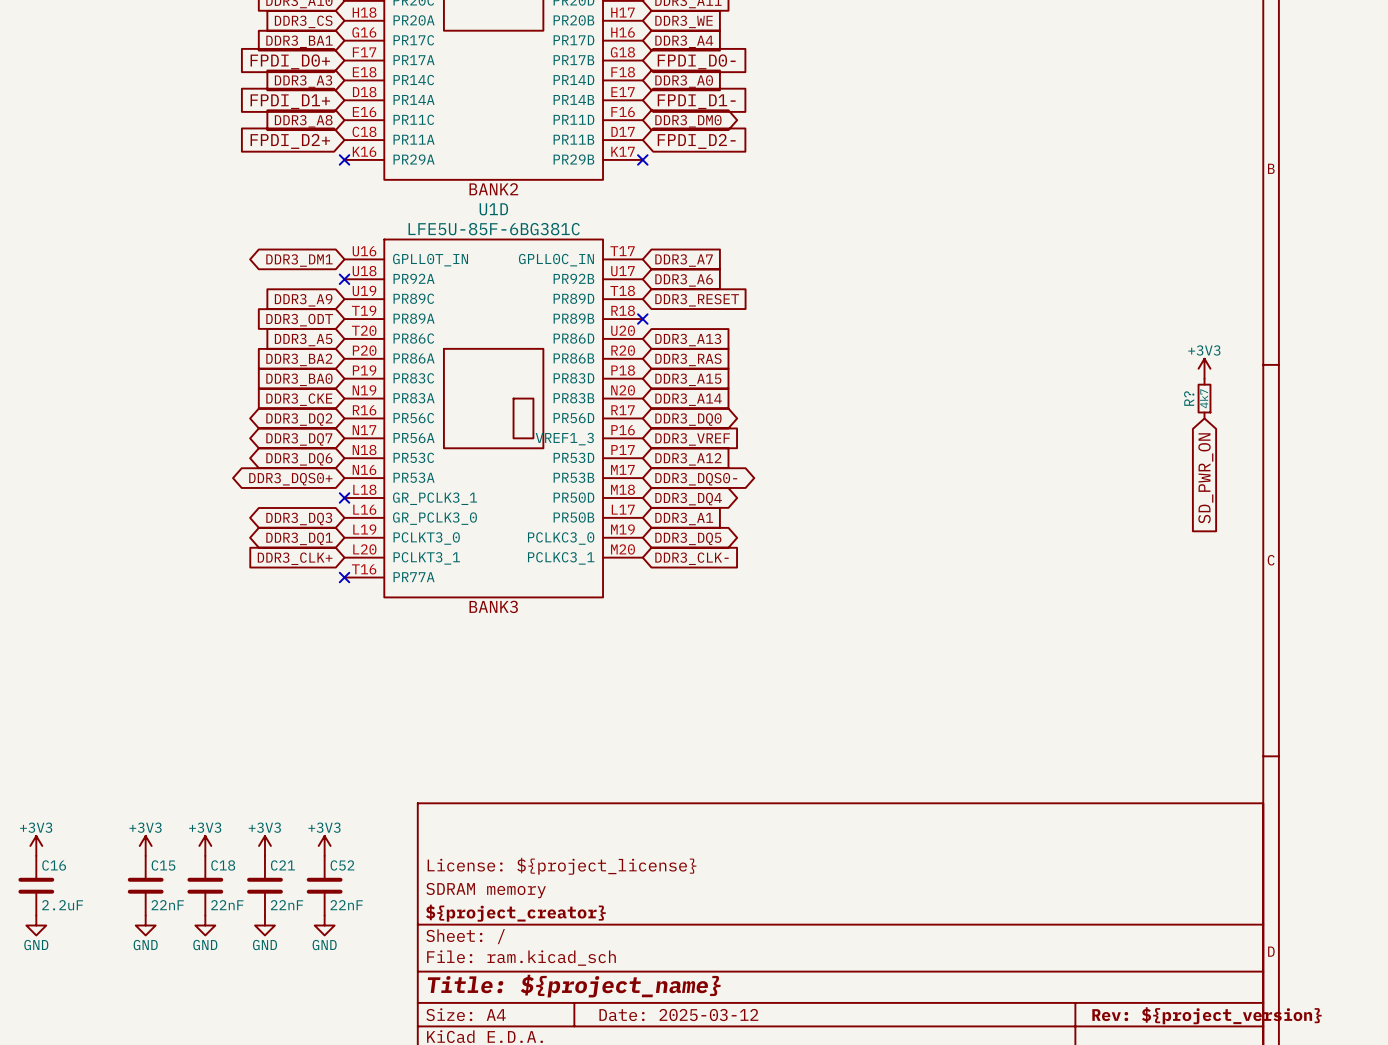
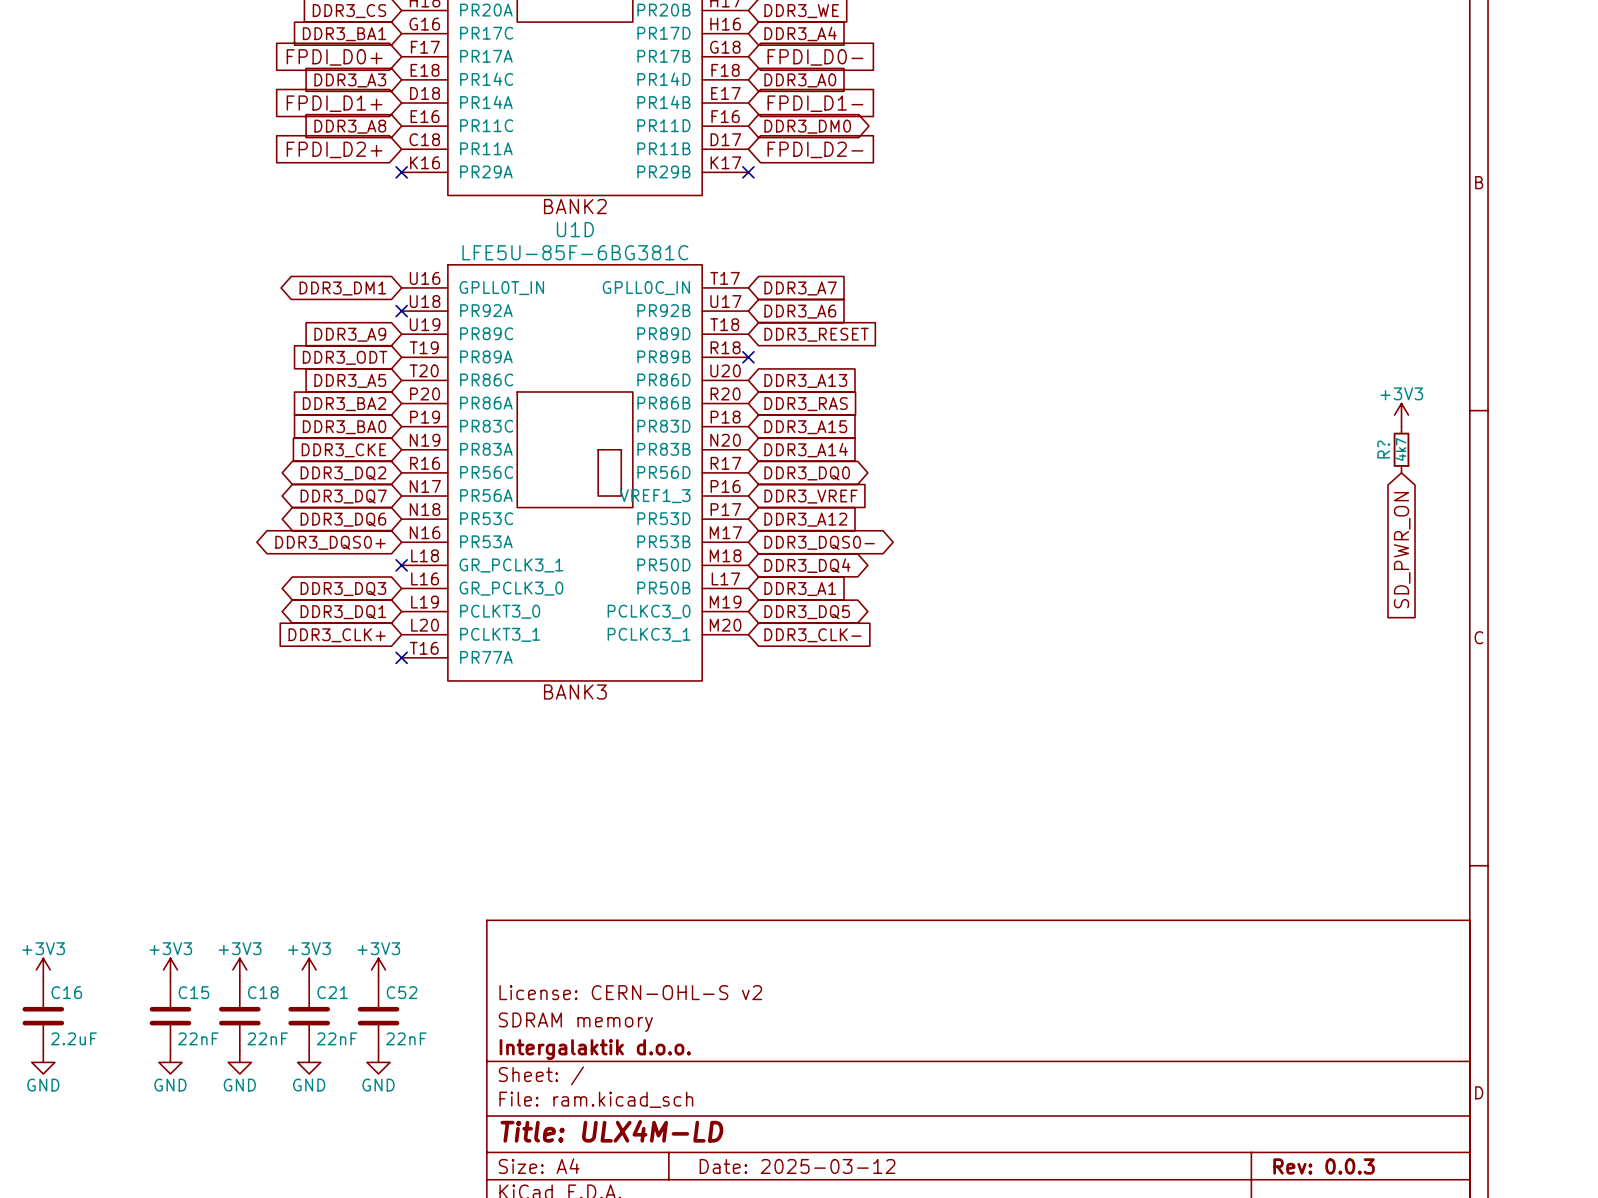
title block: License: ${project_license} (562, 866) -> License: CERN-OHL-S v2 (630, 992)
title block: ${project_creator} (515, 913) -> Intergalaktik d.o.o. (595, 1049)
title block: Title: ${project_name} (574, 986) -> Title: ULX4M-LD (611, 1131)
title block: Rev: ${project_version} (1206, 1015) -> Rev: 0.0.3 (1324, 1166)

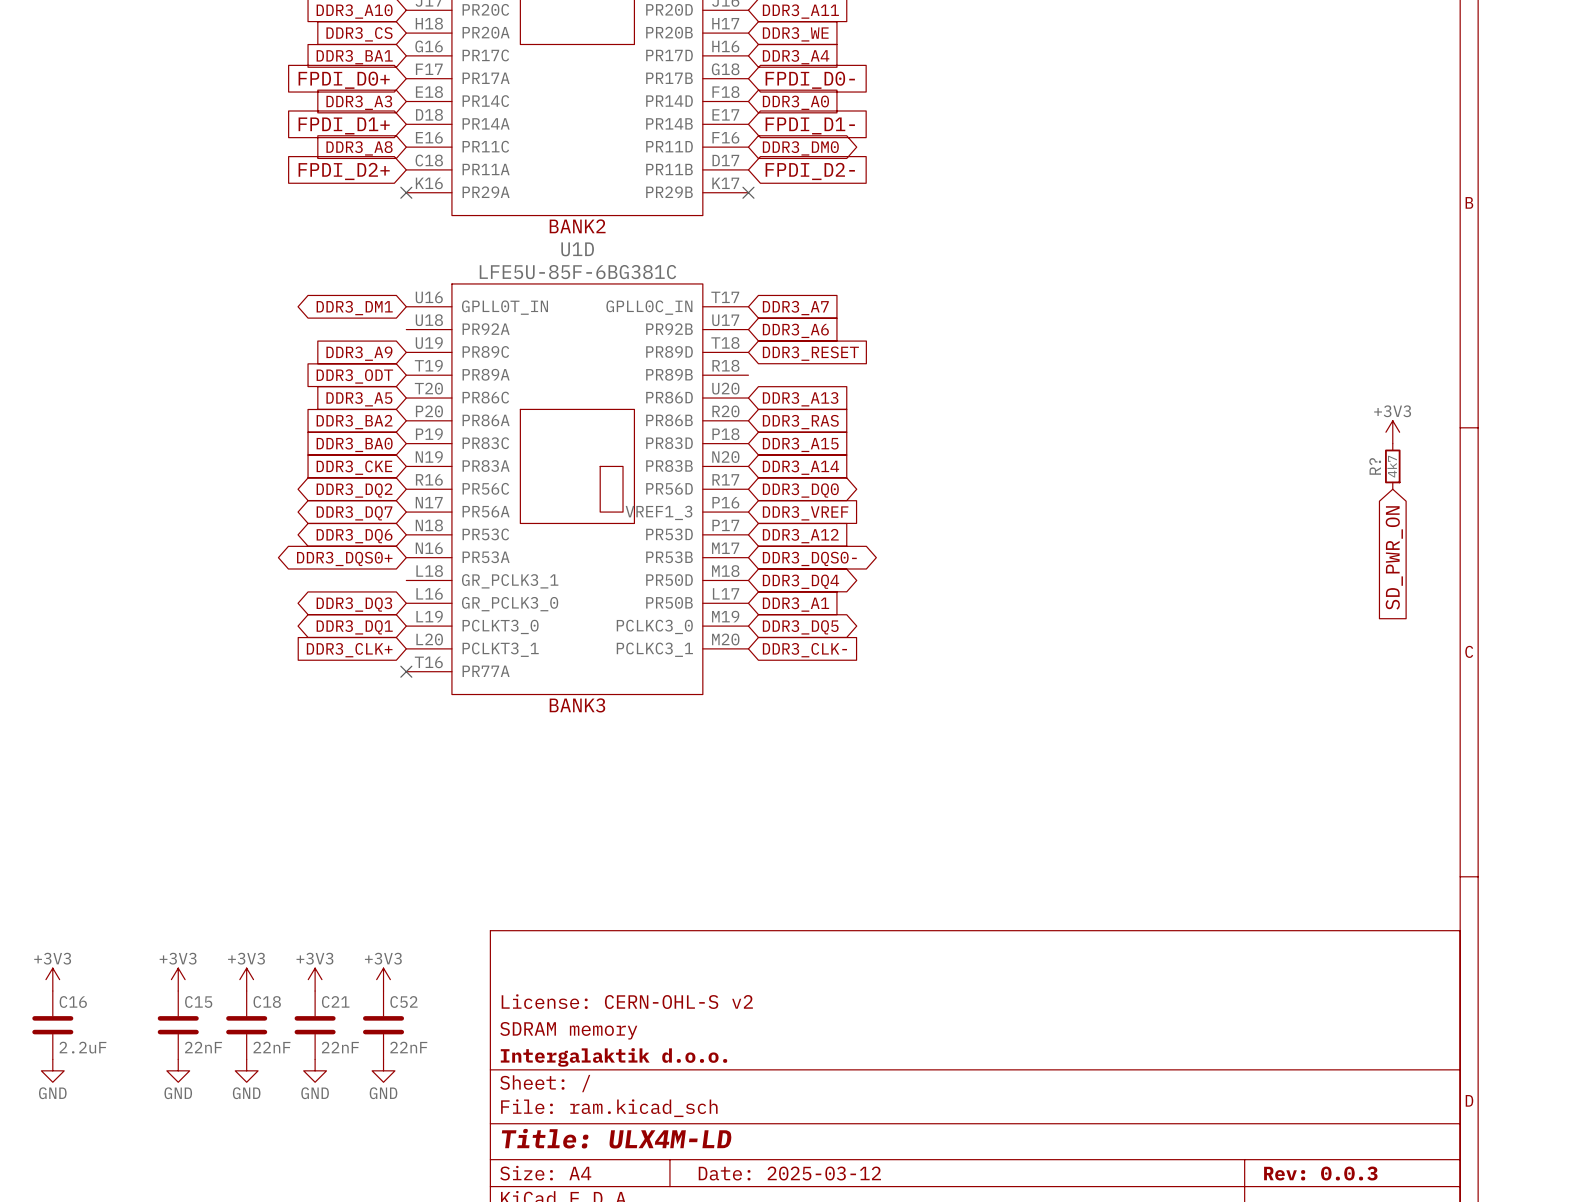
no-connect mark: (401, 311) -> none
no-connect mark: (748, 357) -> none
no-connect mark: (401, 565) -> none

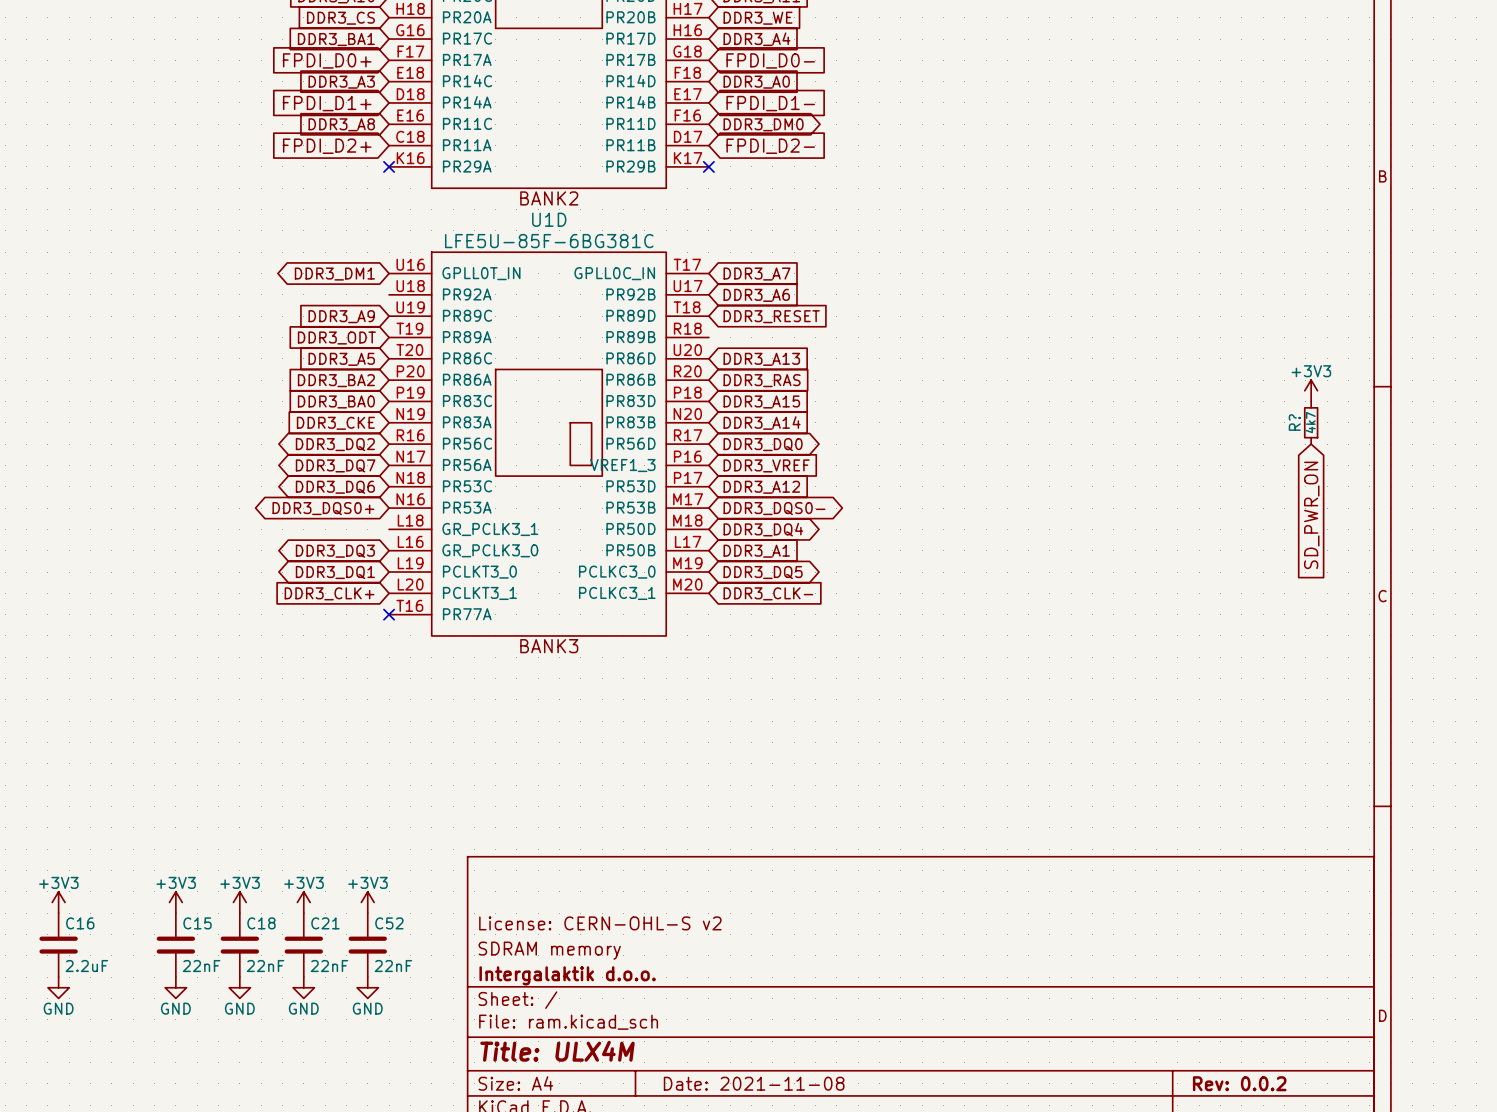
title block: Title: ULX4M-LD (616, 1138) -> Title: ULX4M (557, 1051)
title block: Date: 2025-03-12 (789, 1173) -> Date: 2021-11-08 (754, 1083)
title block: Rev: 0.0.3 (1320, 1173) -> Rev: 0.0.2 (1239, 1083)

